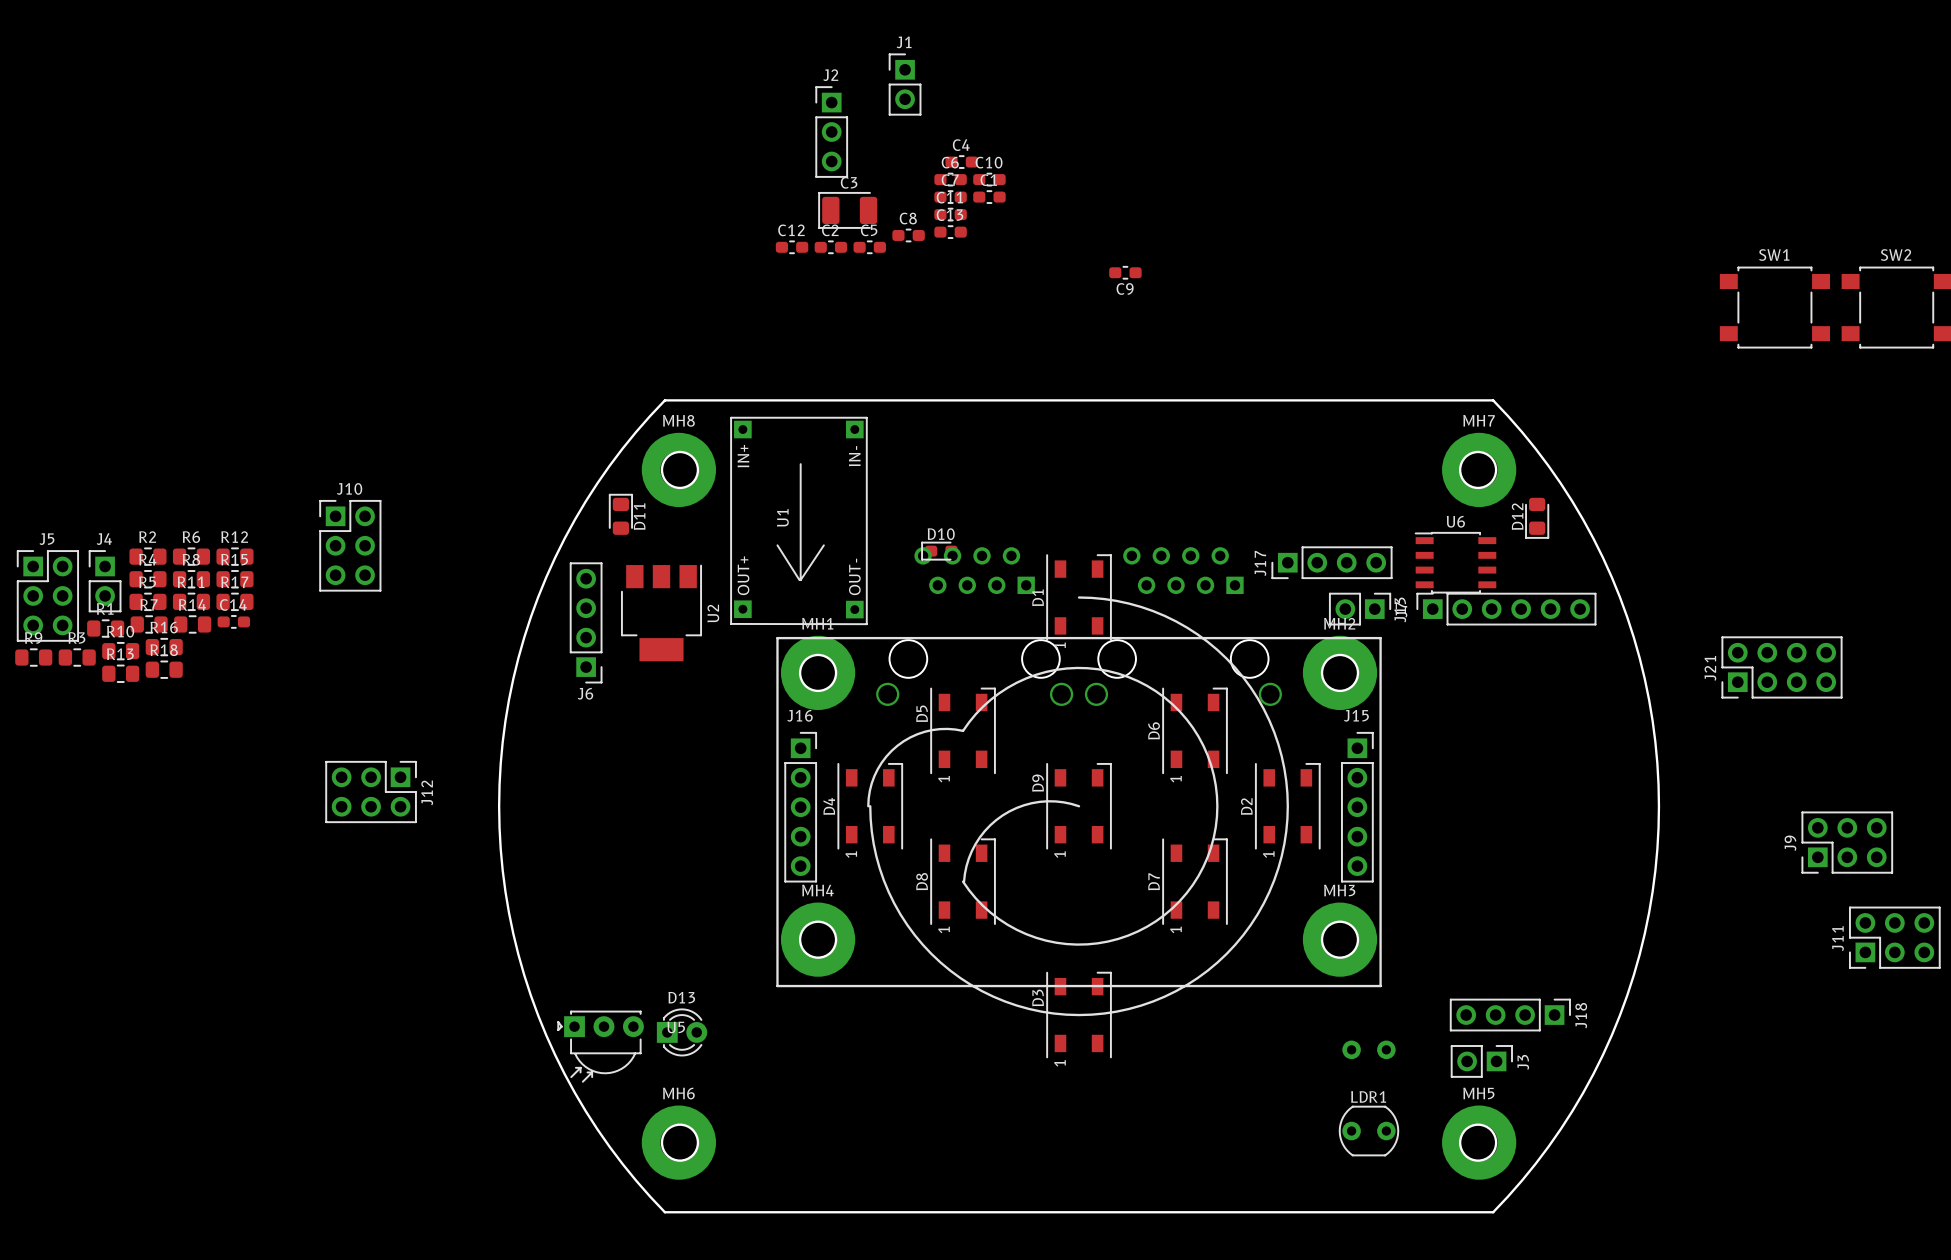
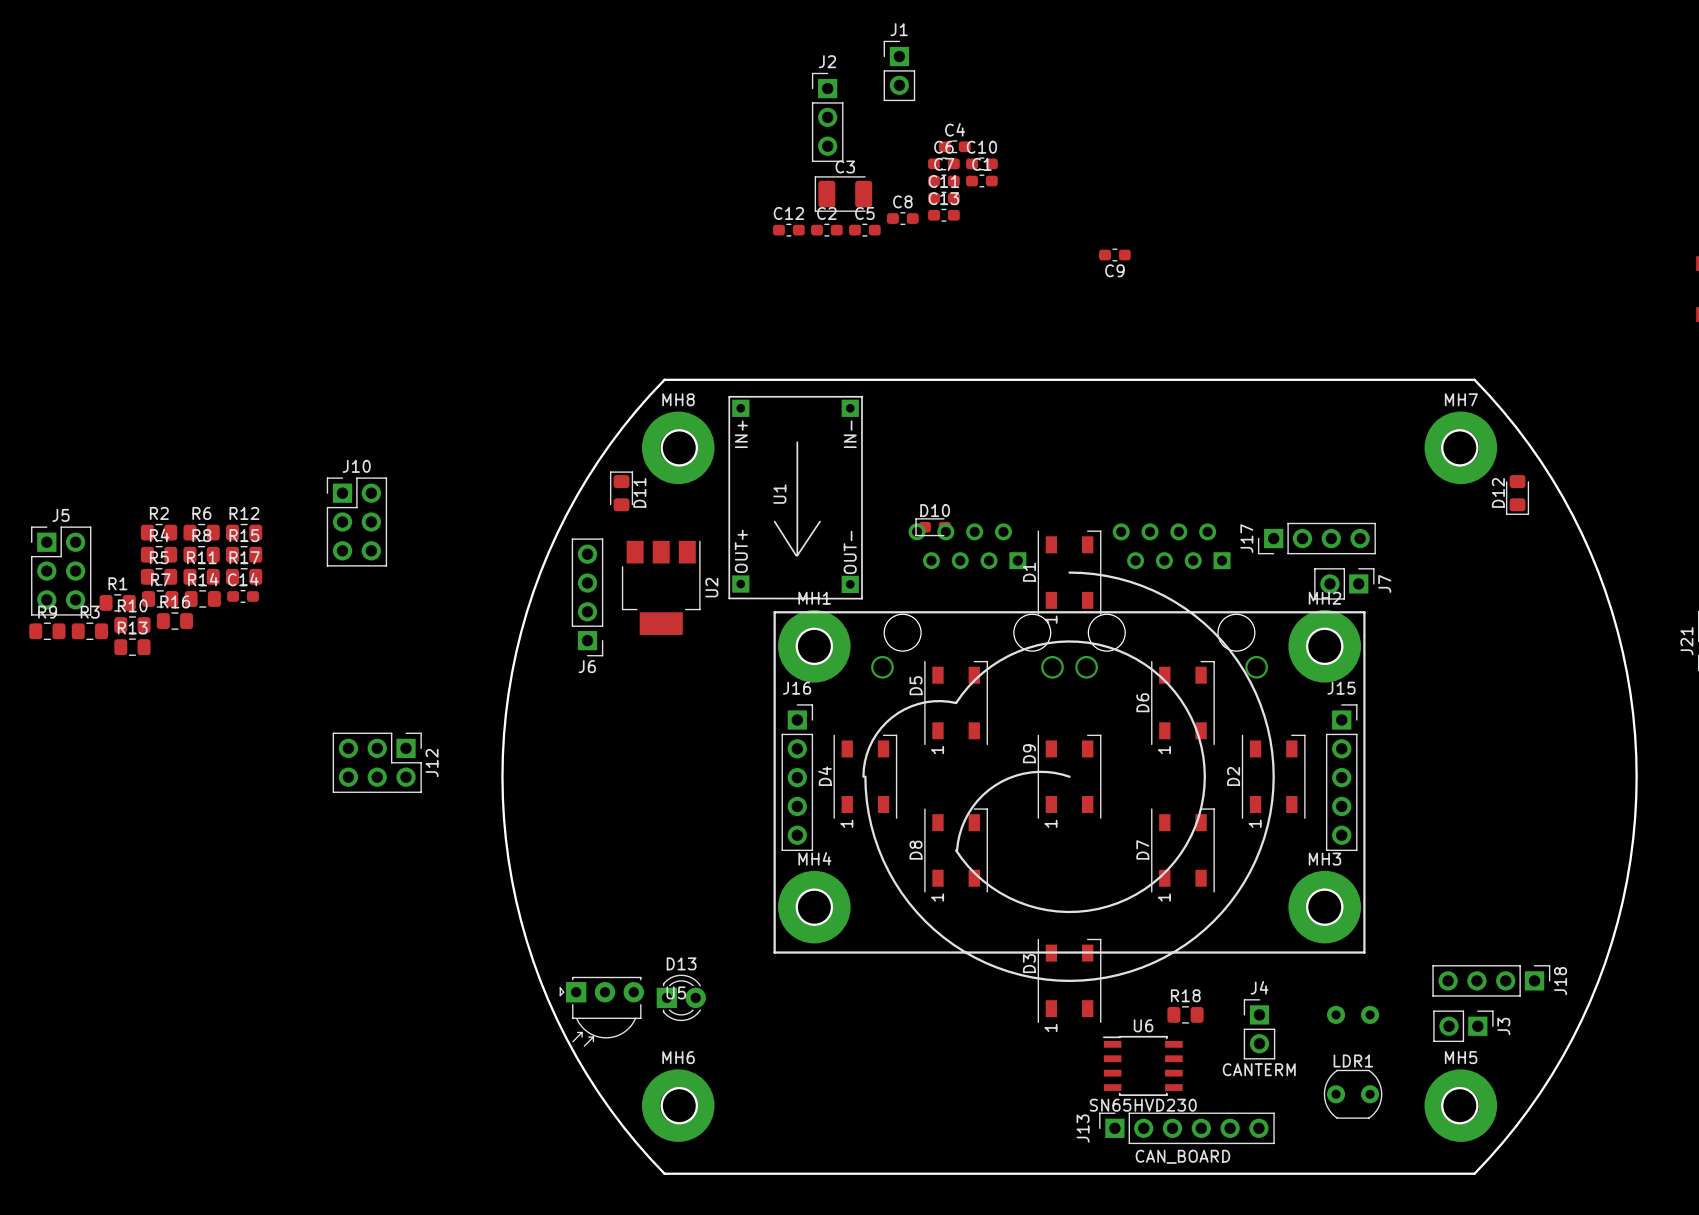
U6 position: (1455, 562) -> (1142, 1065)
J4 position: (105, 581) -> (1259, 1029)
J13 position: (1506, 609) -> (1186, 1128)
R18 position: (164, 669) -> (1185, 1014)
J4 value: none -> CANTERM (1259, 1069)
U6 value: none -> SN65HVD230 (1143, 1105)
J13 value: none -> CAN_BOARD (1182, 1156)

